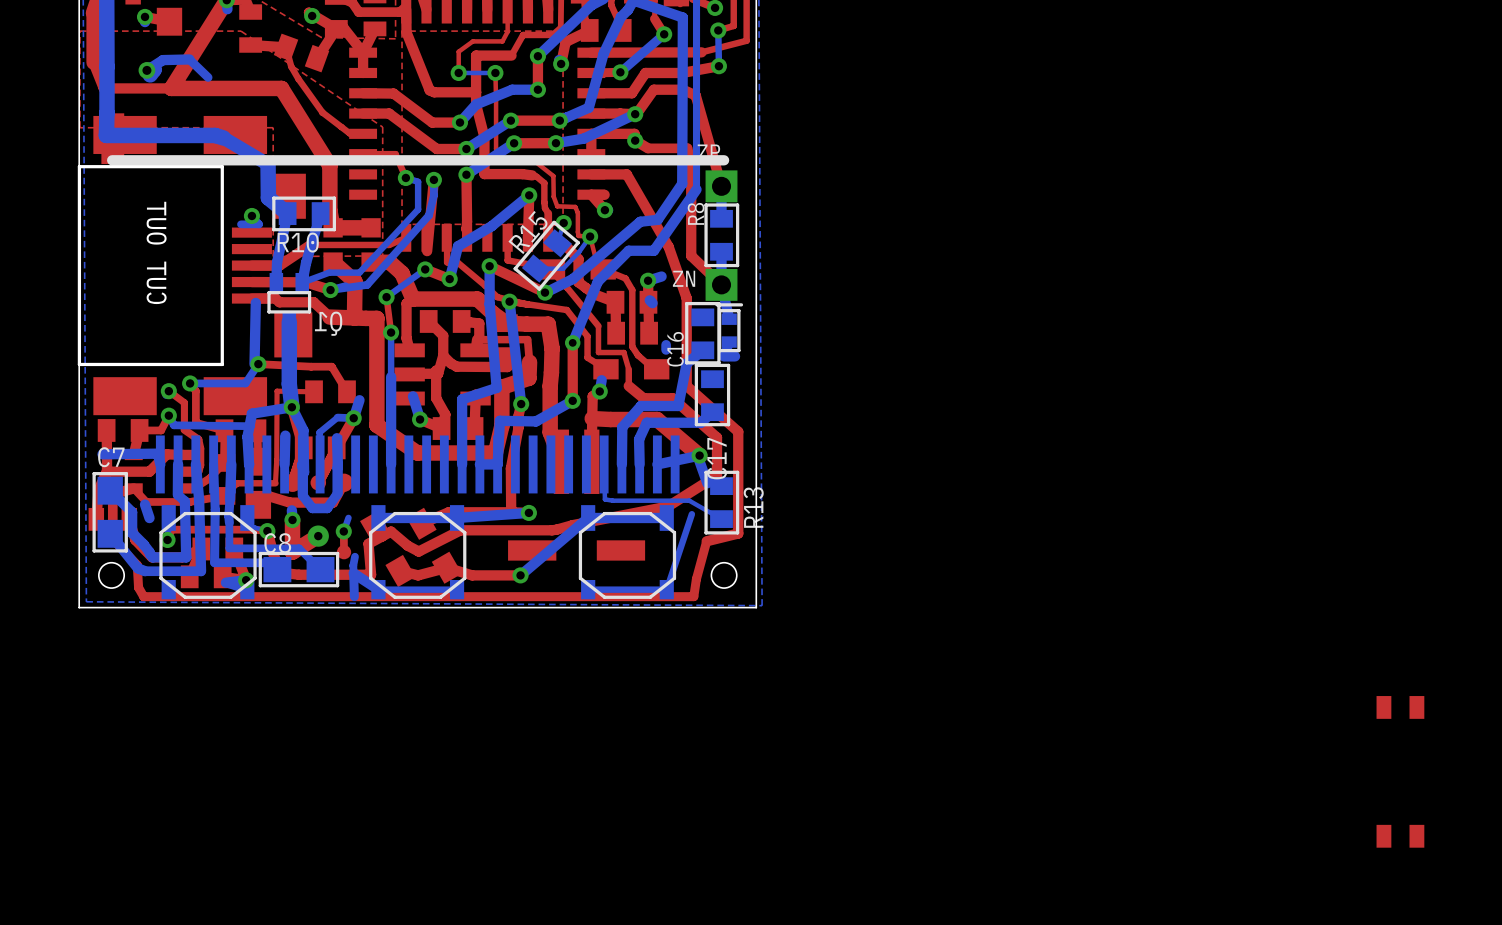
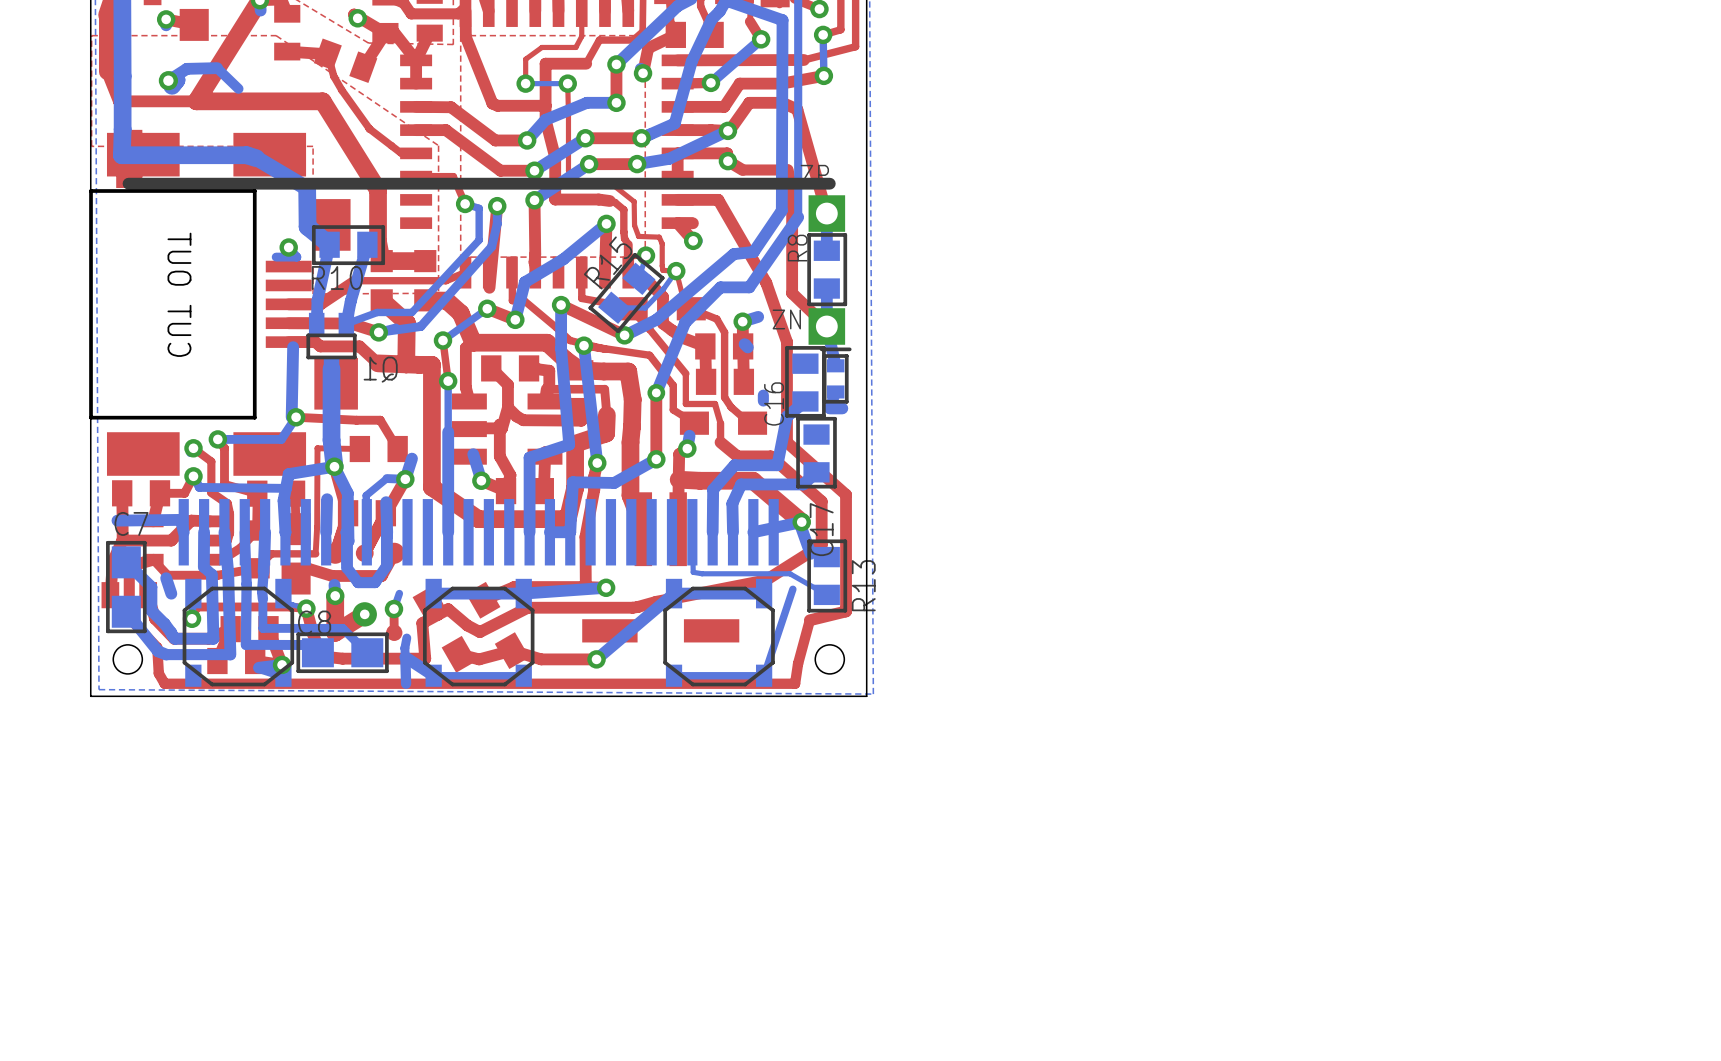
part: (1400, 707) -> none
part: (1400, 836) -> none

